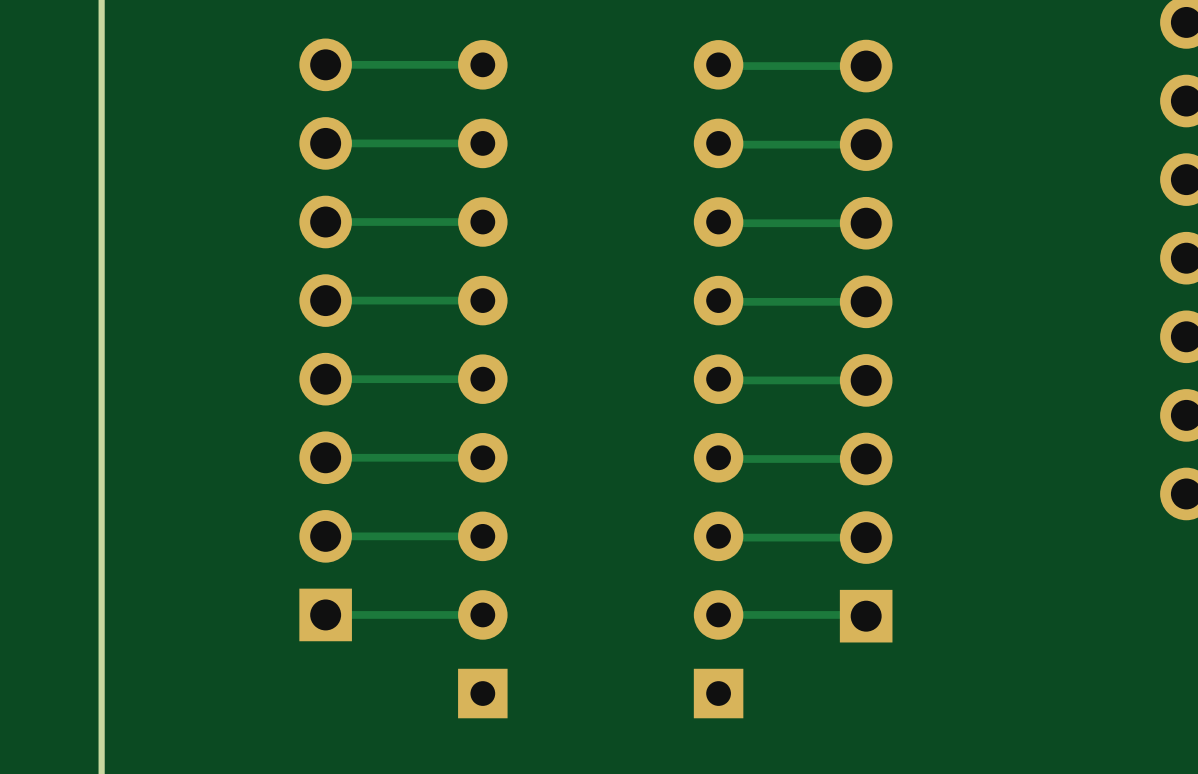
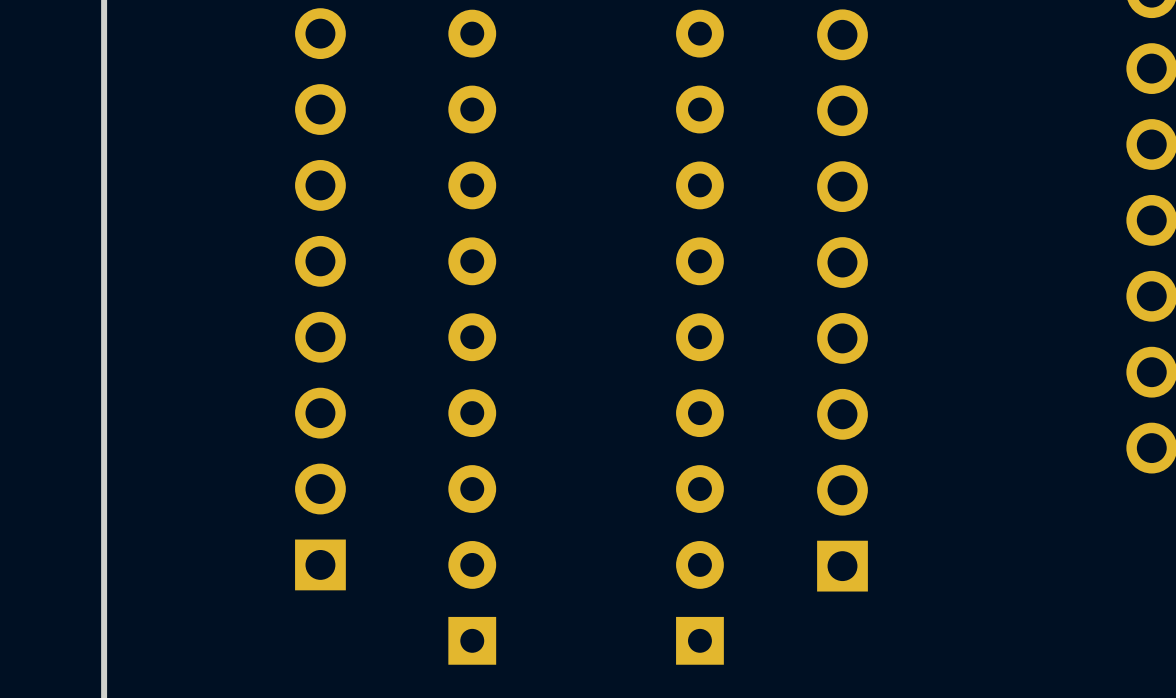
track: (482, 64) (325, 64) -> none
track: (726, 64) (866, 66) -> none
track: (482, 143) (325, 143) -> none
track: (726, 143) (866, 144) -> none
track: (482, 222) (325, 222) -> none
track: (726, 222) (866, 223) -> none
track: (482, 300) (325, 300) -> none
track: (726, 300) (866, 301) -> none
track: (482, 379) (325, 379) -> none
track: (726, 379) (866, 380) -> none
track: (482, 457) (325, 457) -> none
track: (726, 457) (866, 459) -> none
track: (482, 536) (325, 536) -> none
track: (726, 536) (866, 537) -> none
track: (482, 614) (325, 614) -> none
track: (726, 614) (866, 616) -> none

